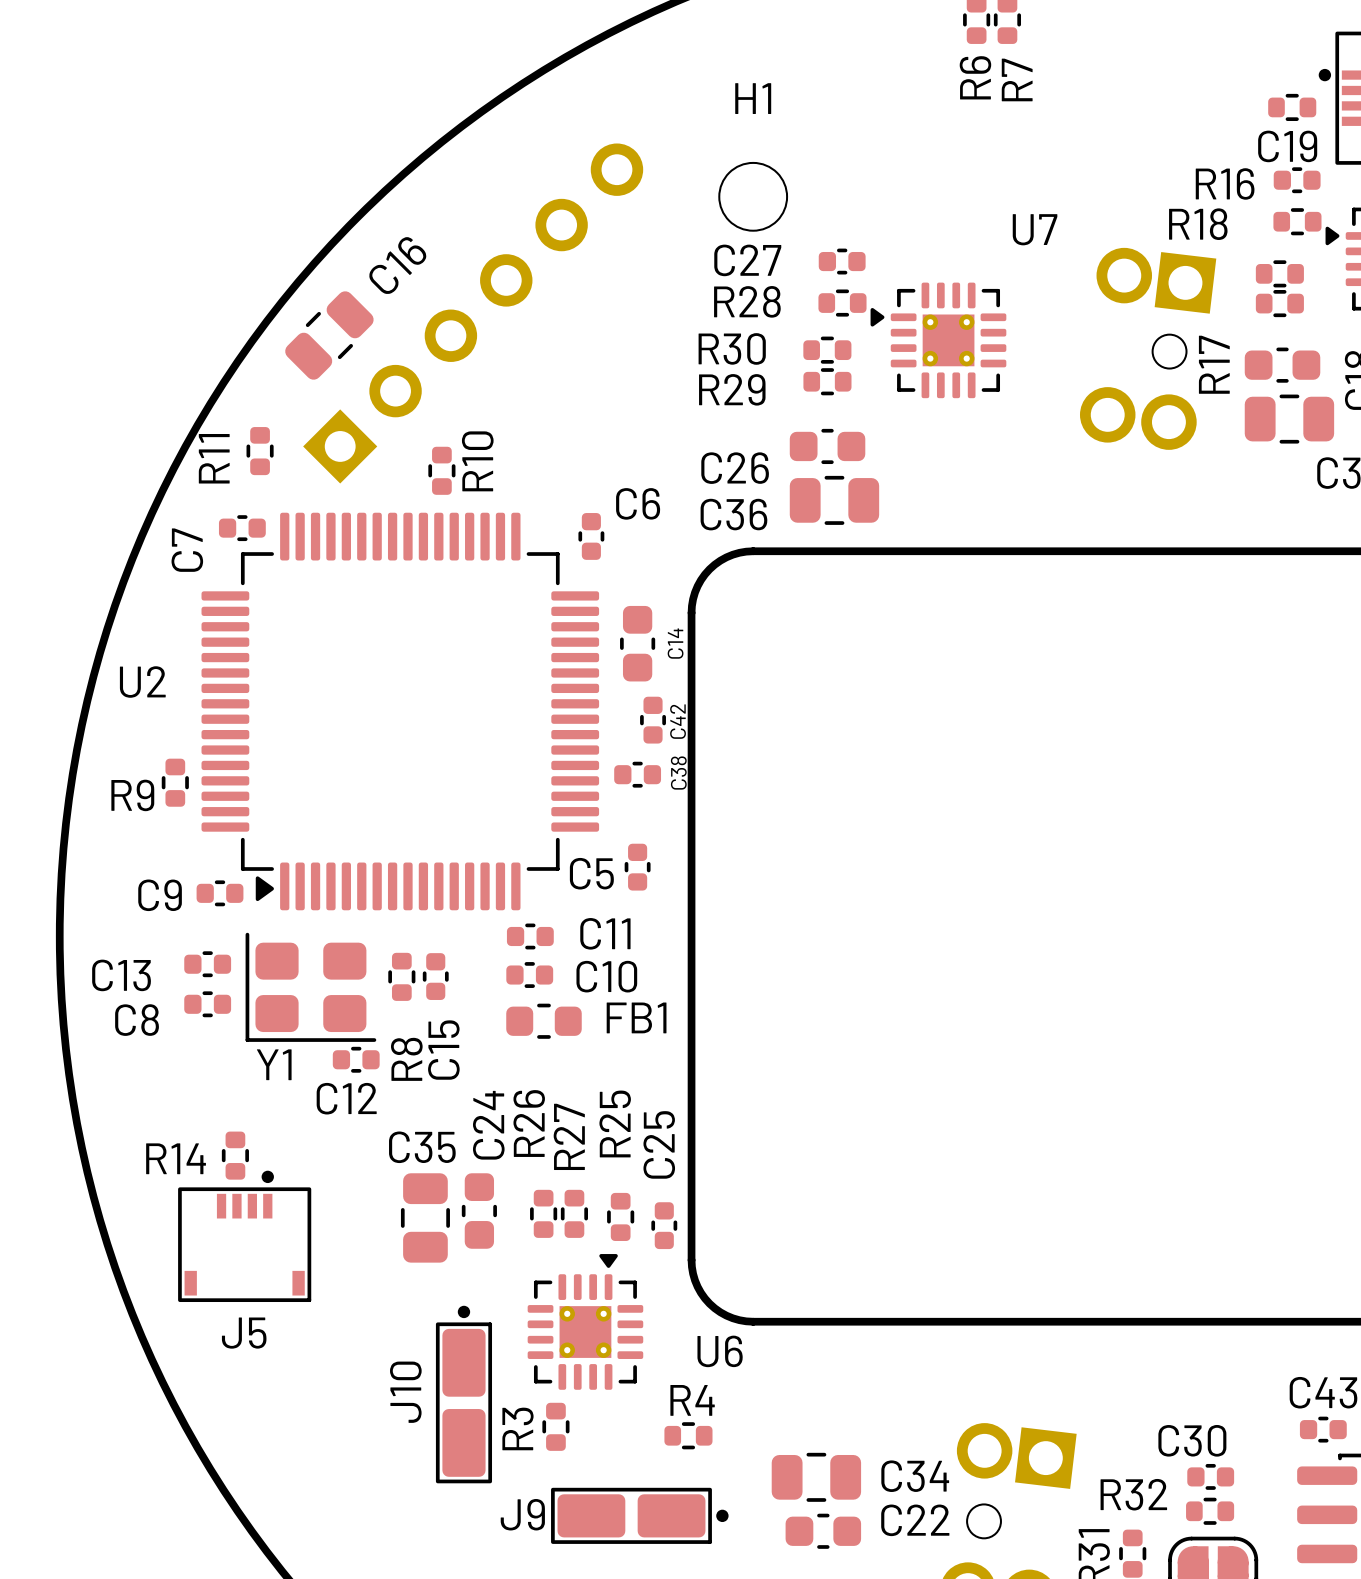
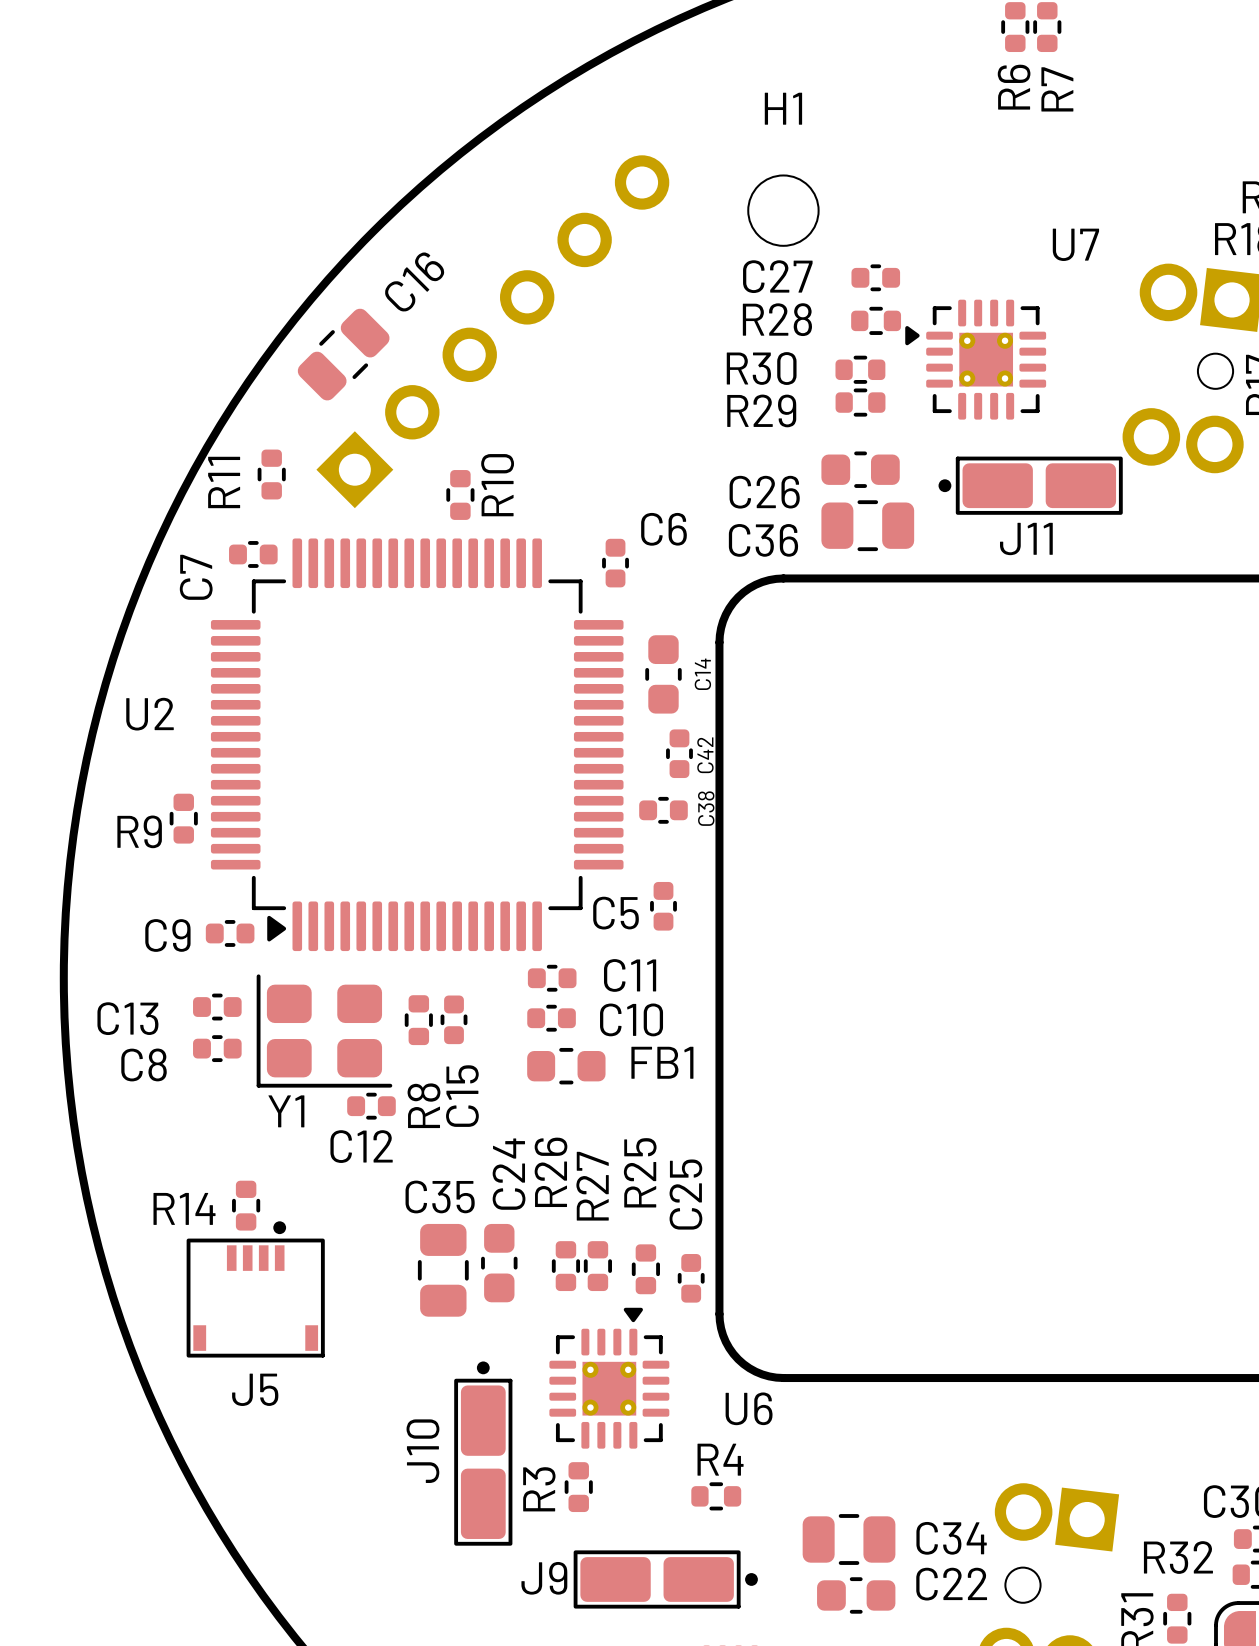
J11: none -> (1030, 485)

